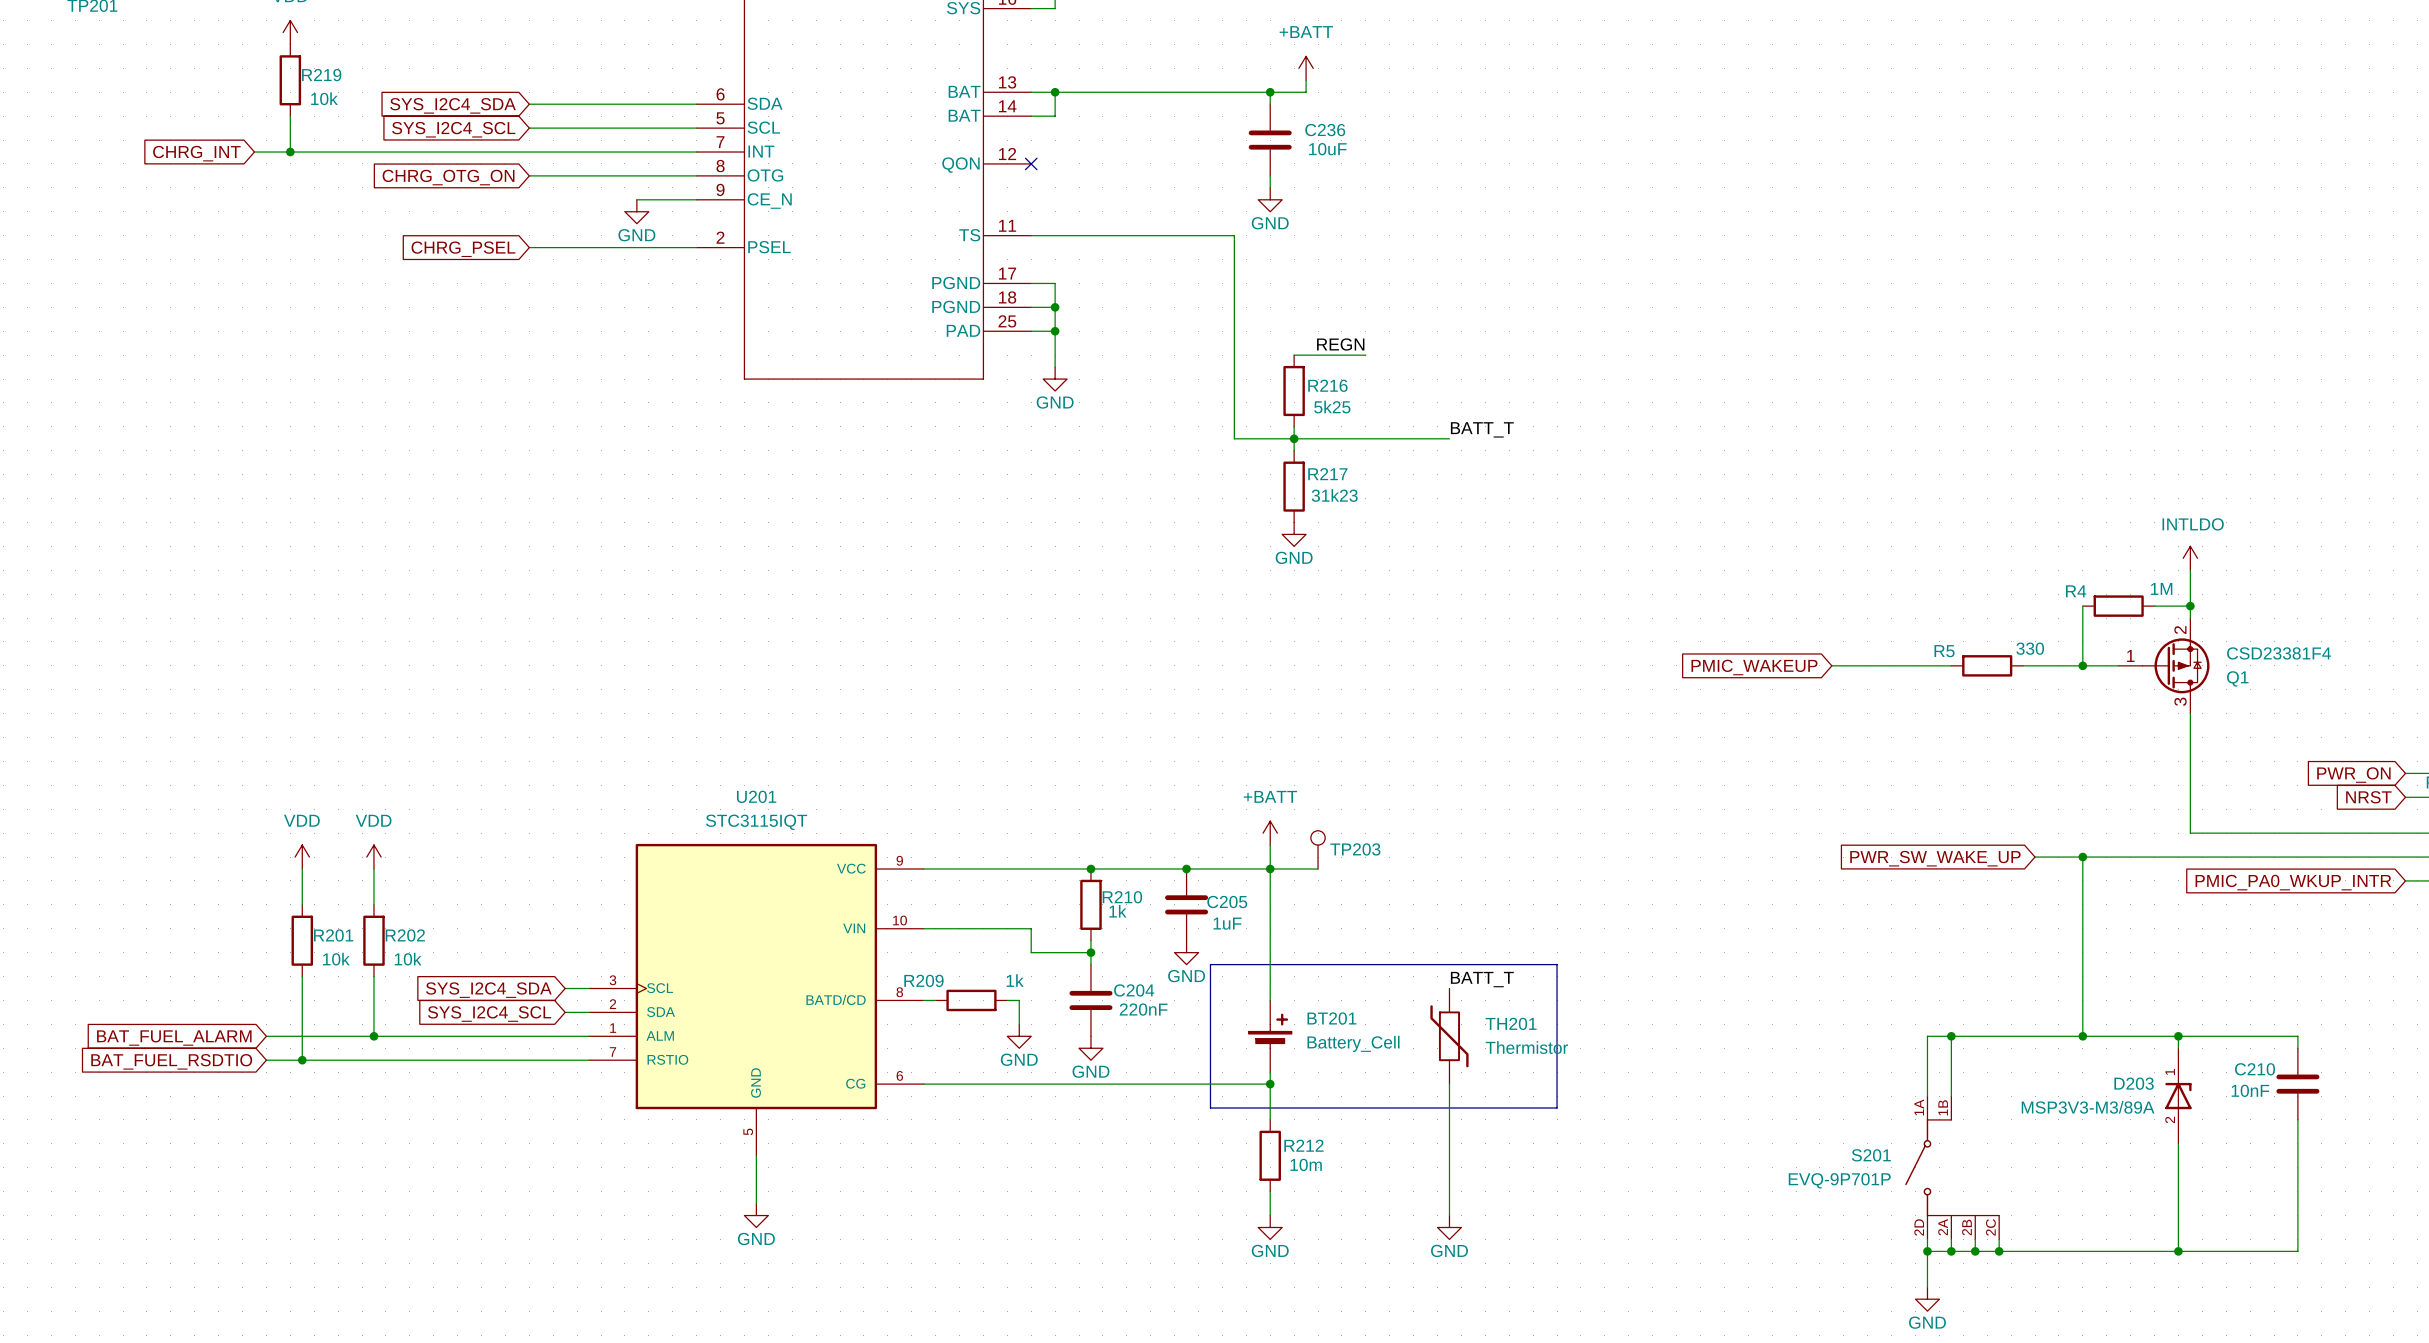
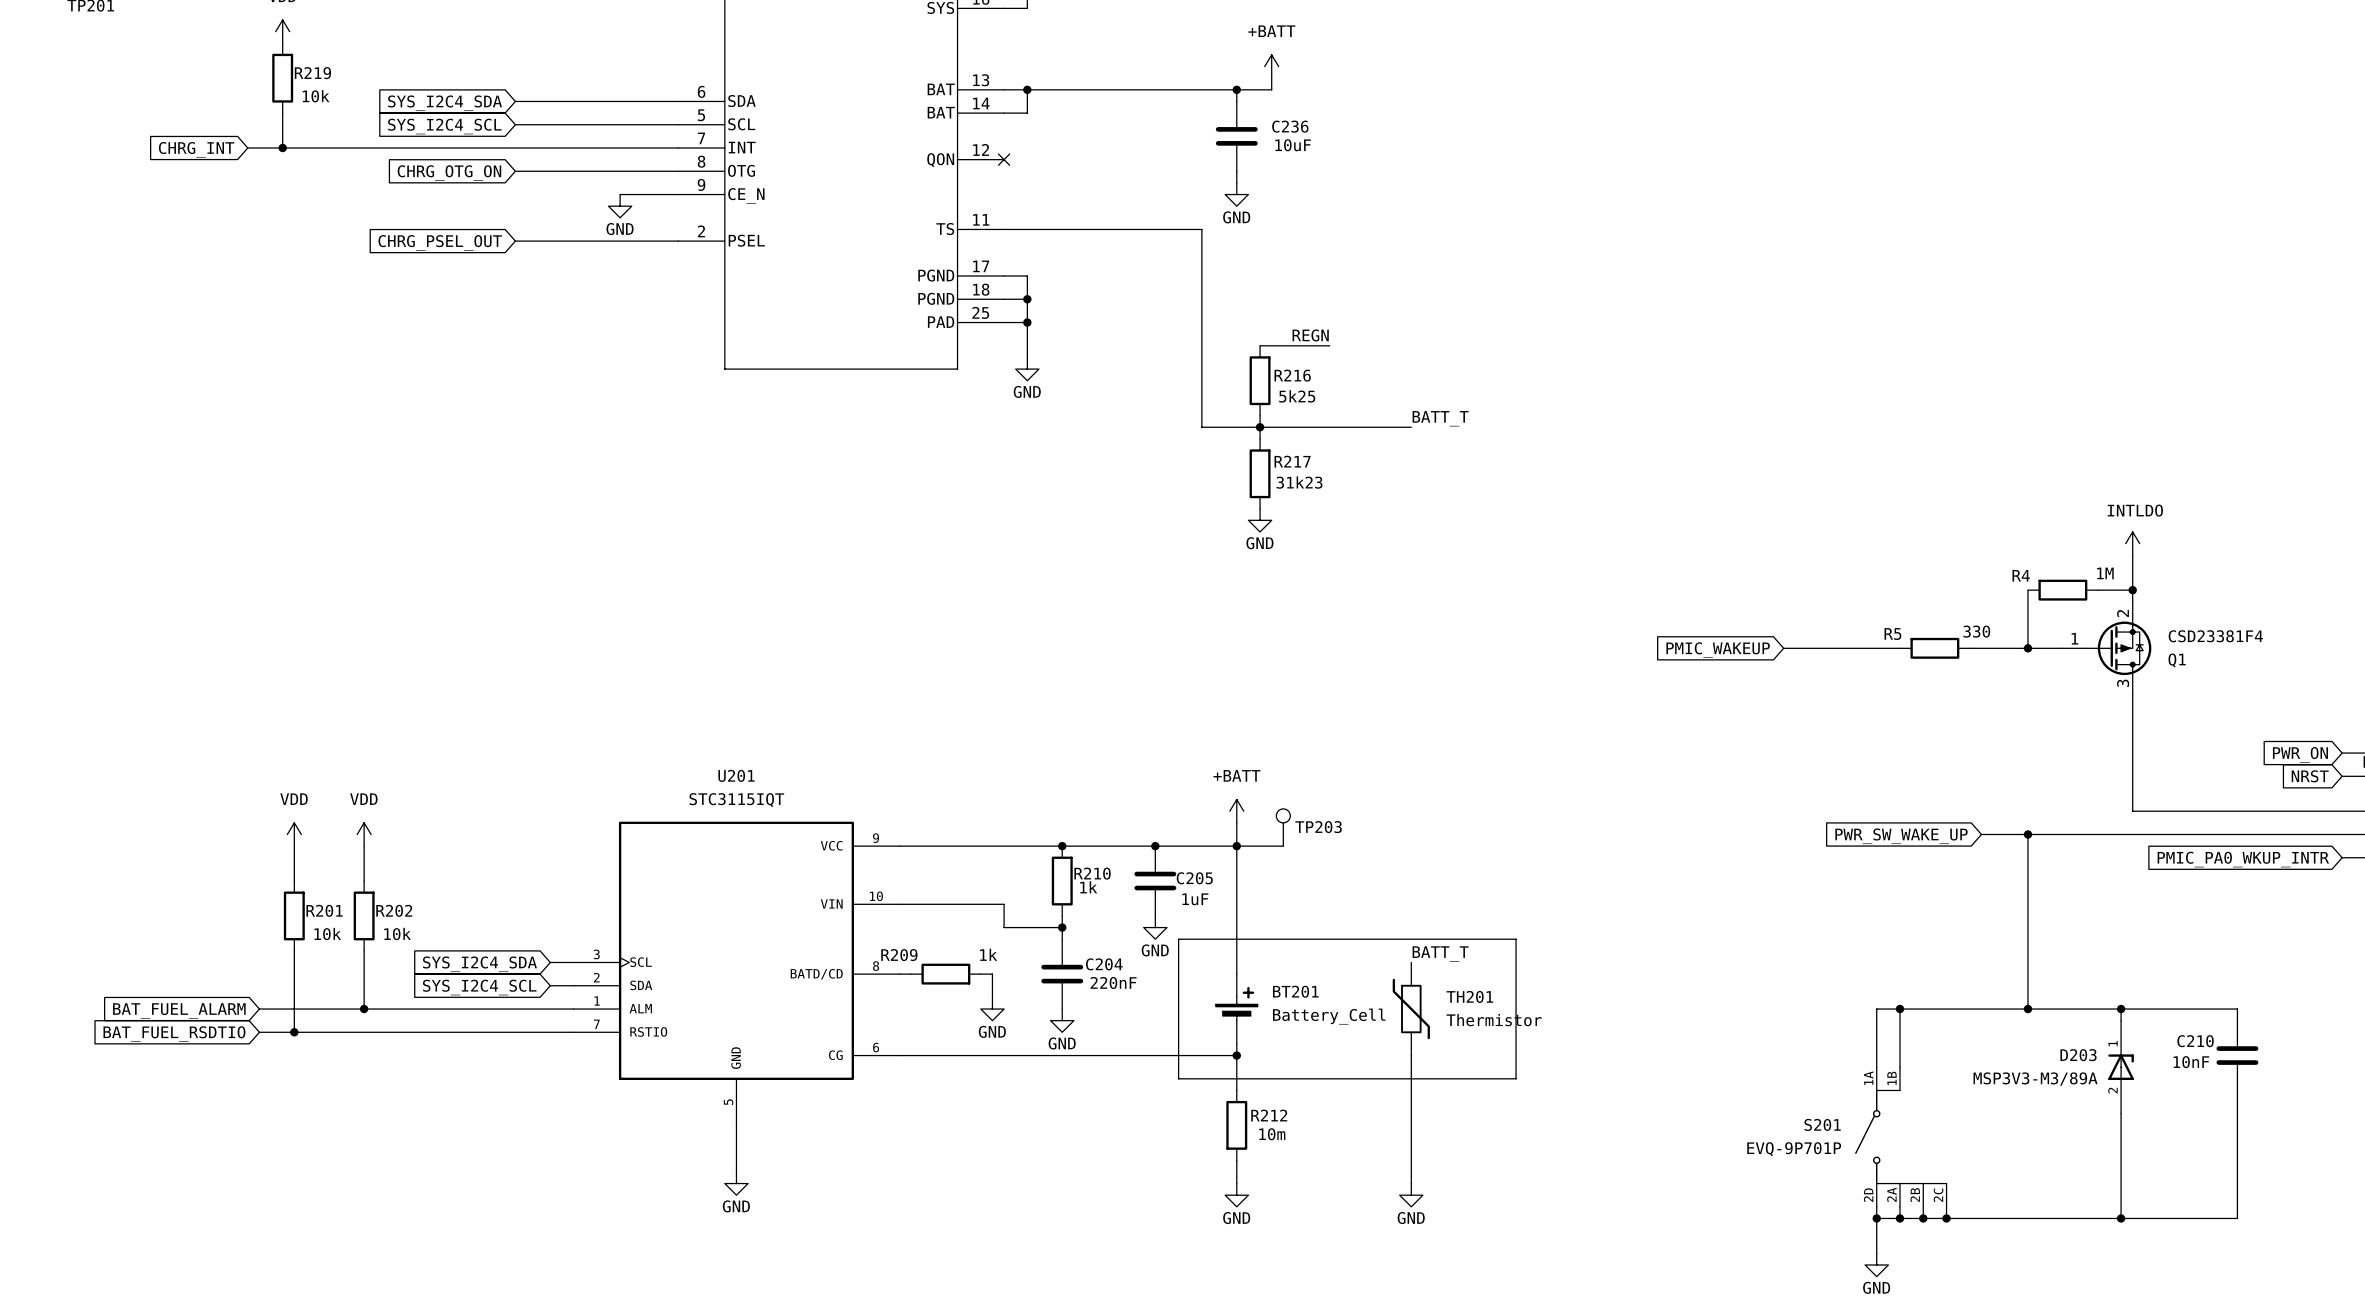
global label: CHRG_PSEL (463, 249) -> CHRG_PSEL_OUT (440, 242)

